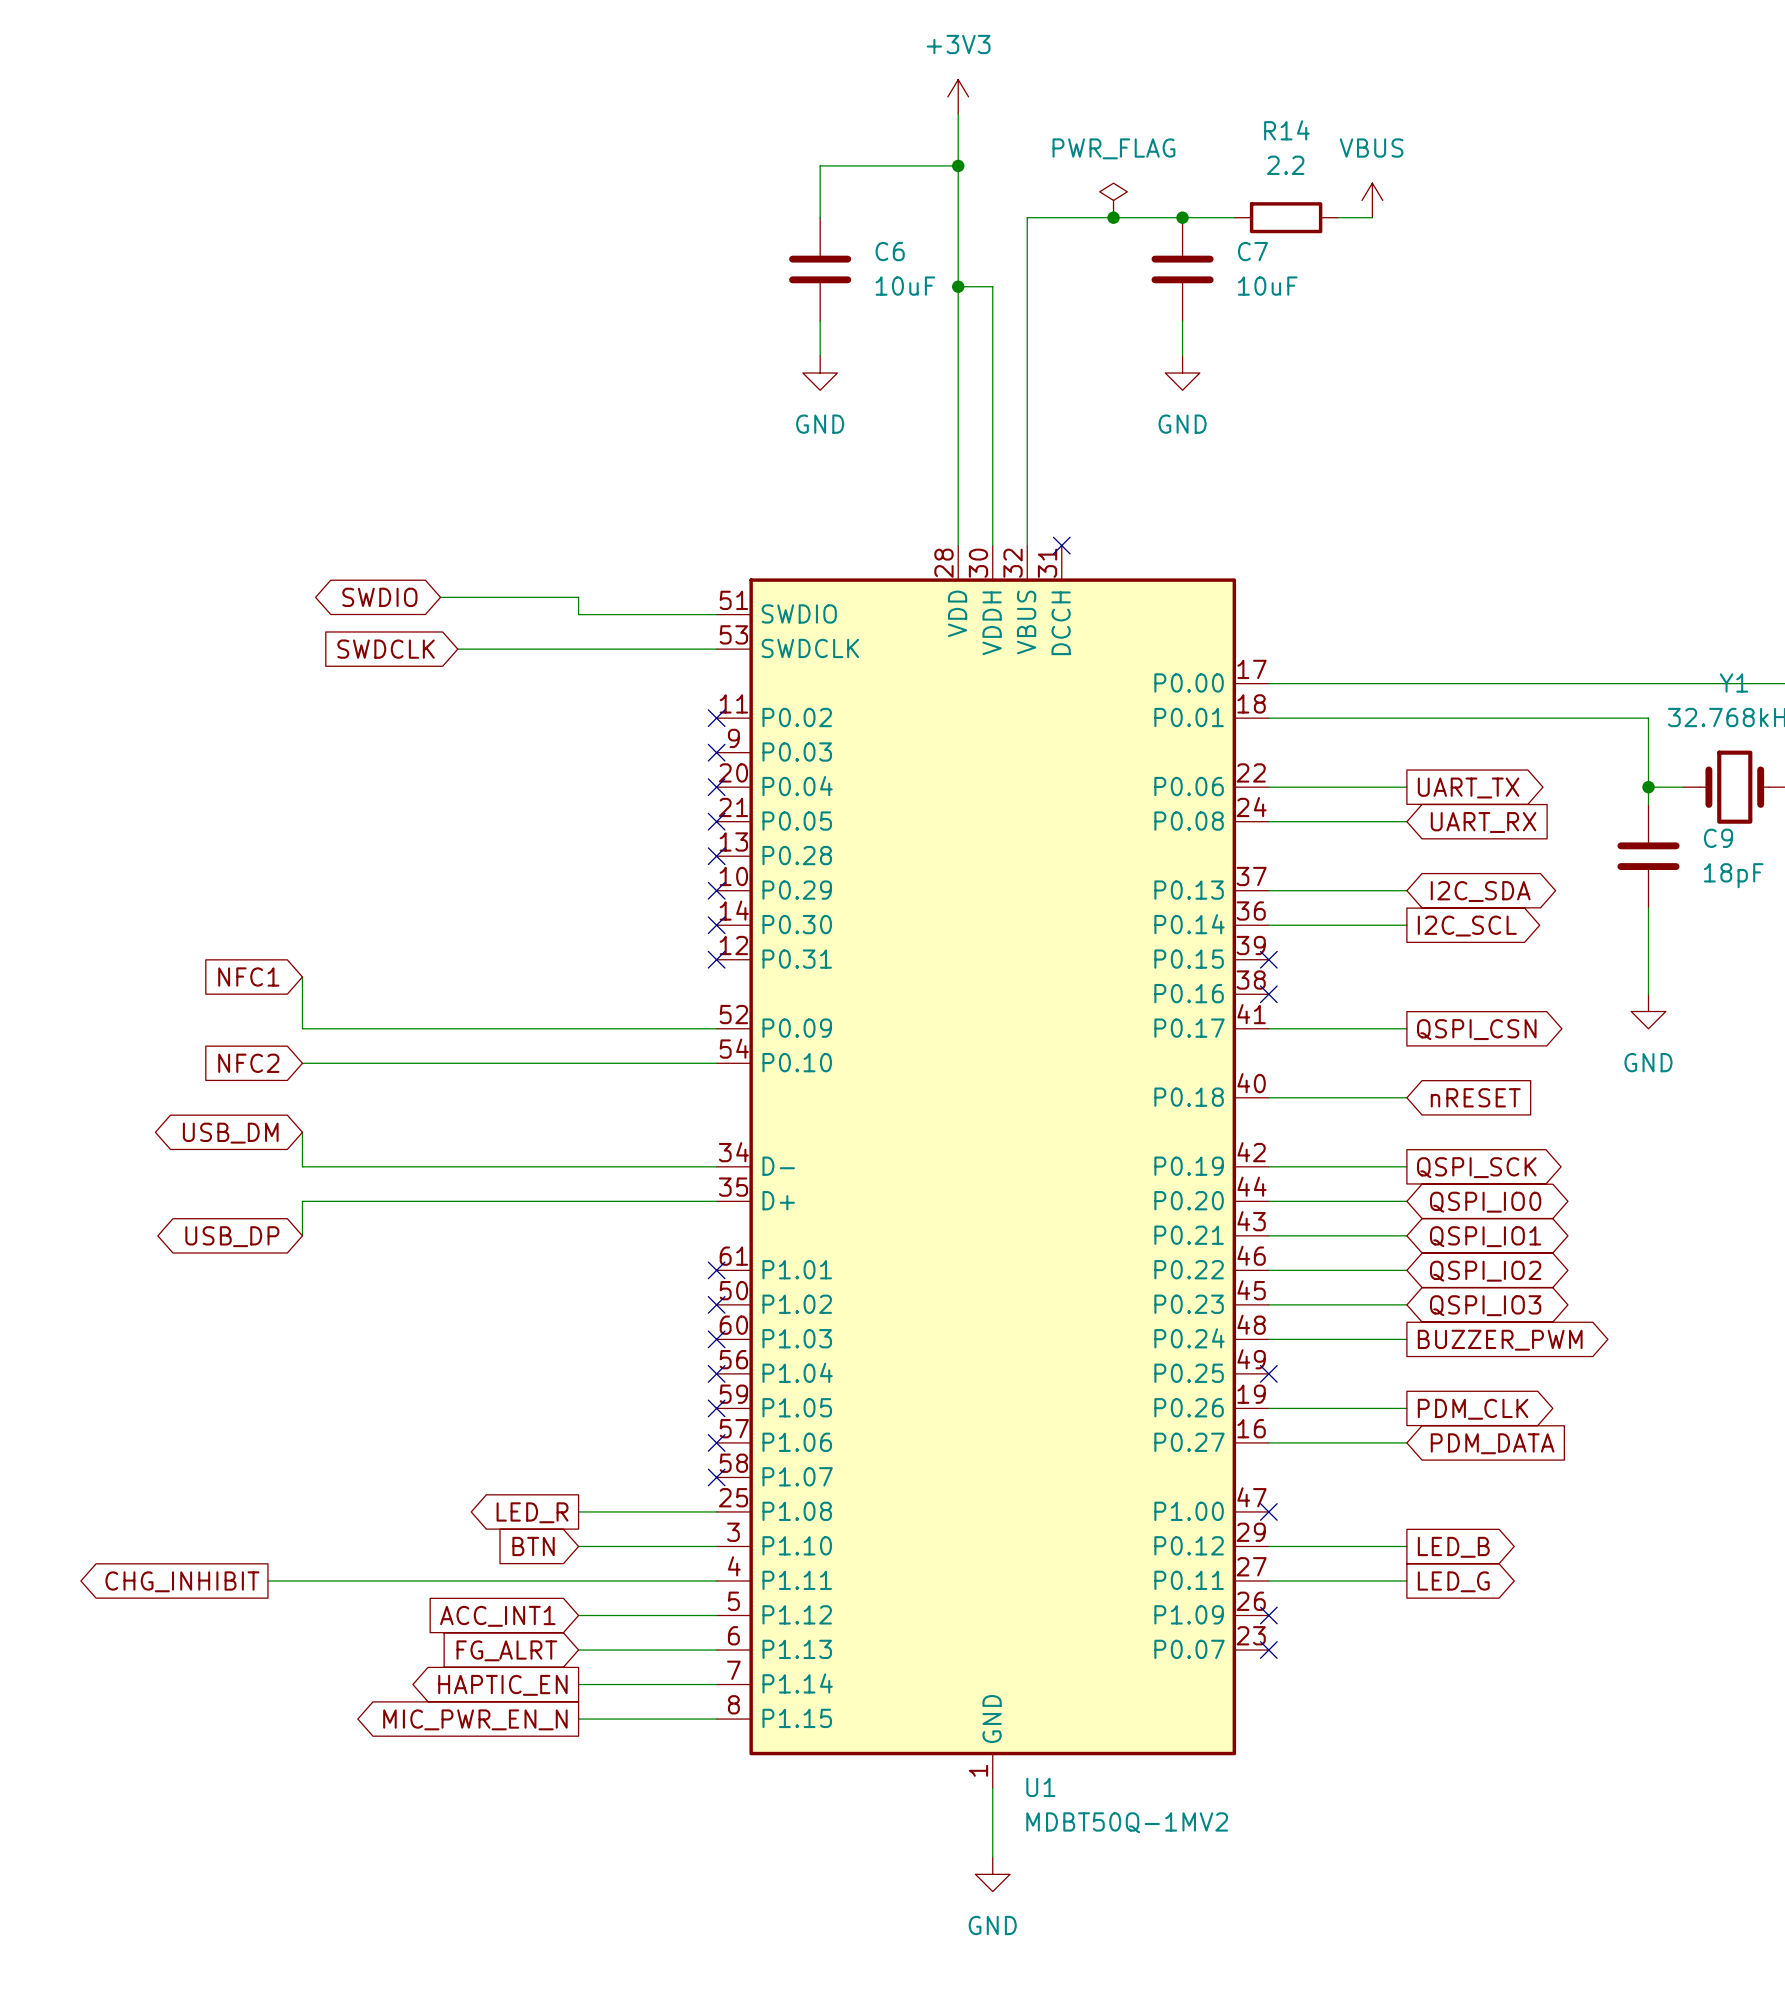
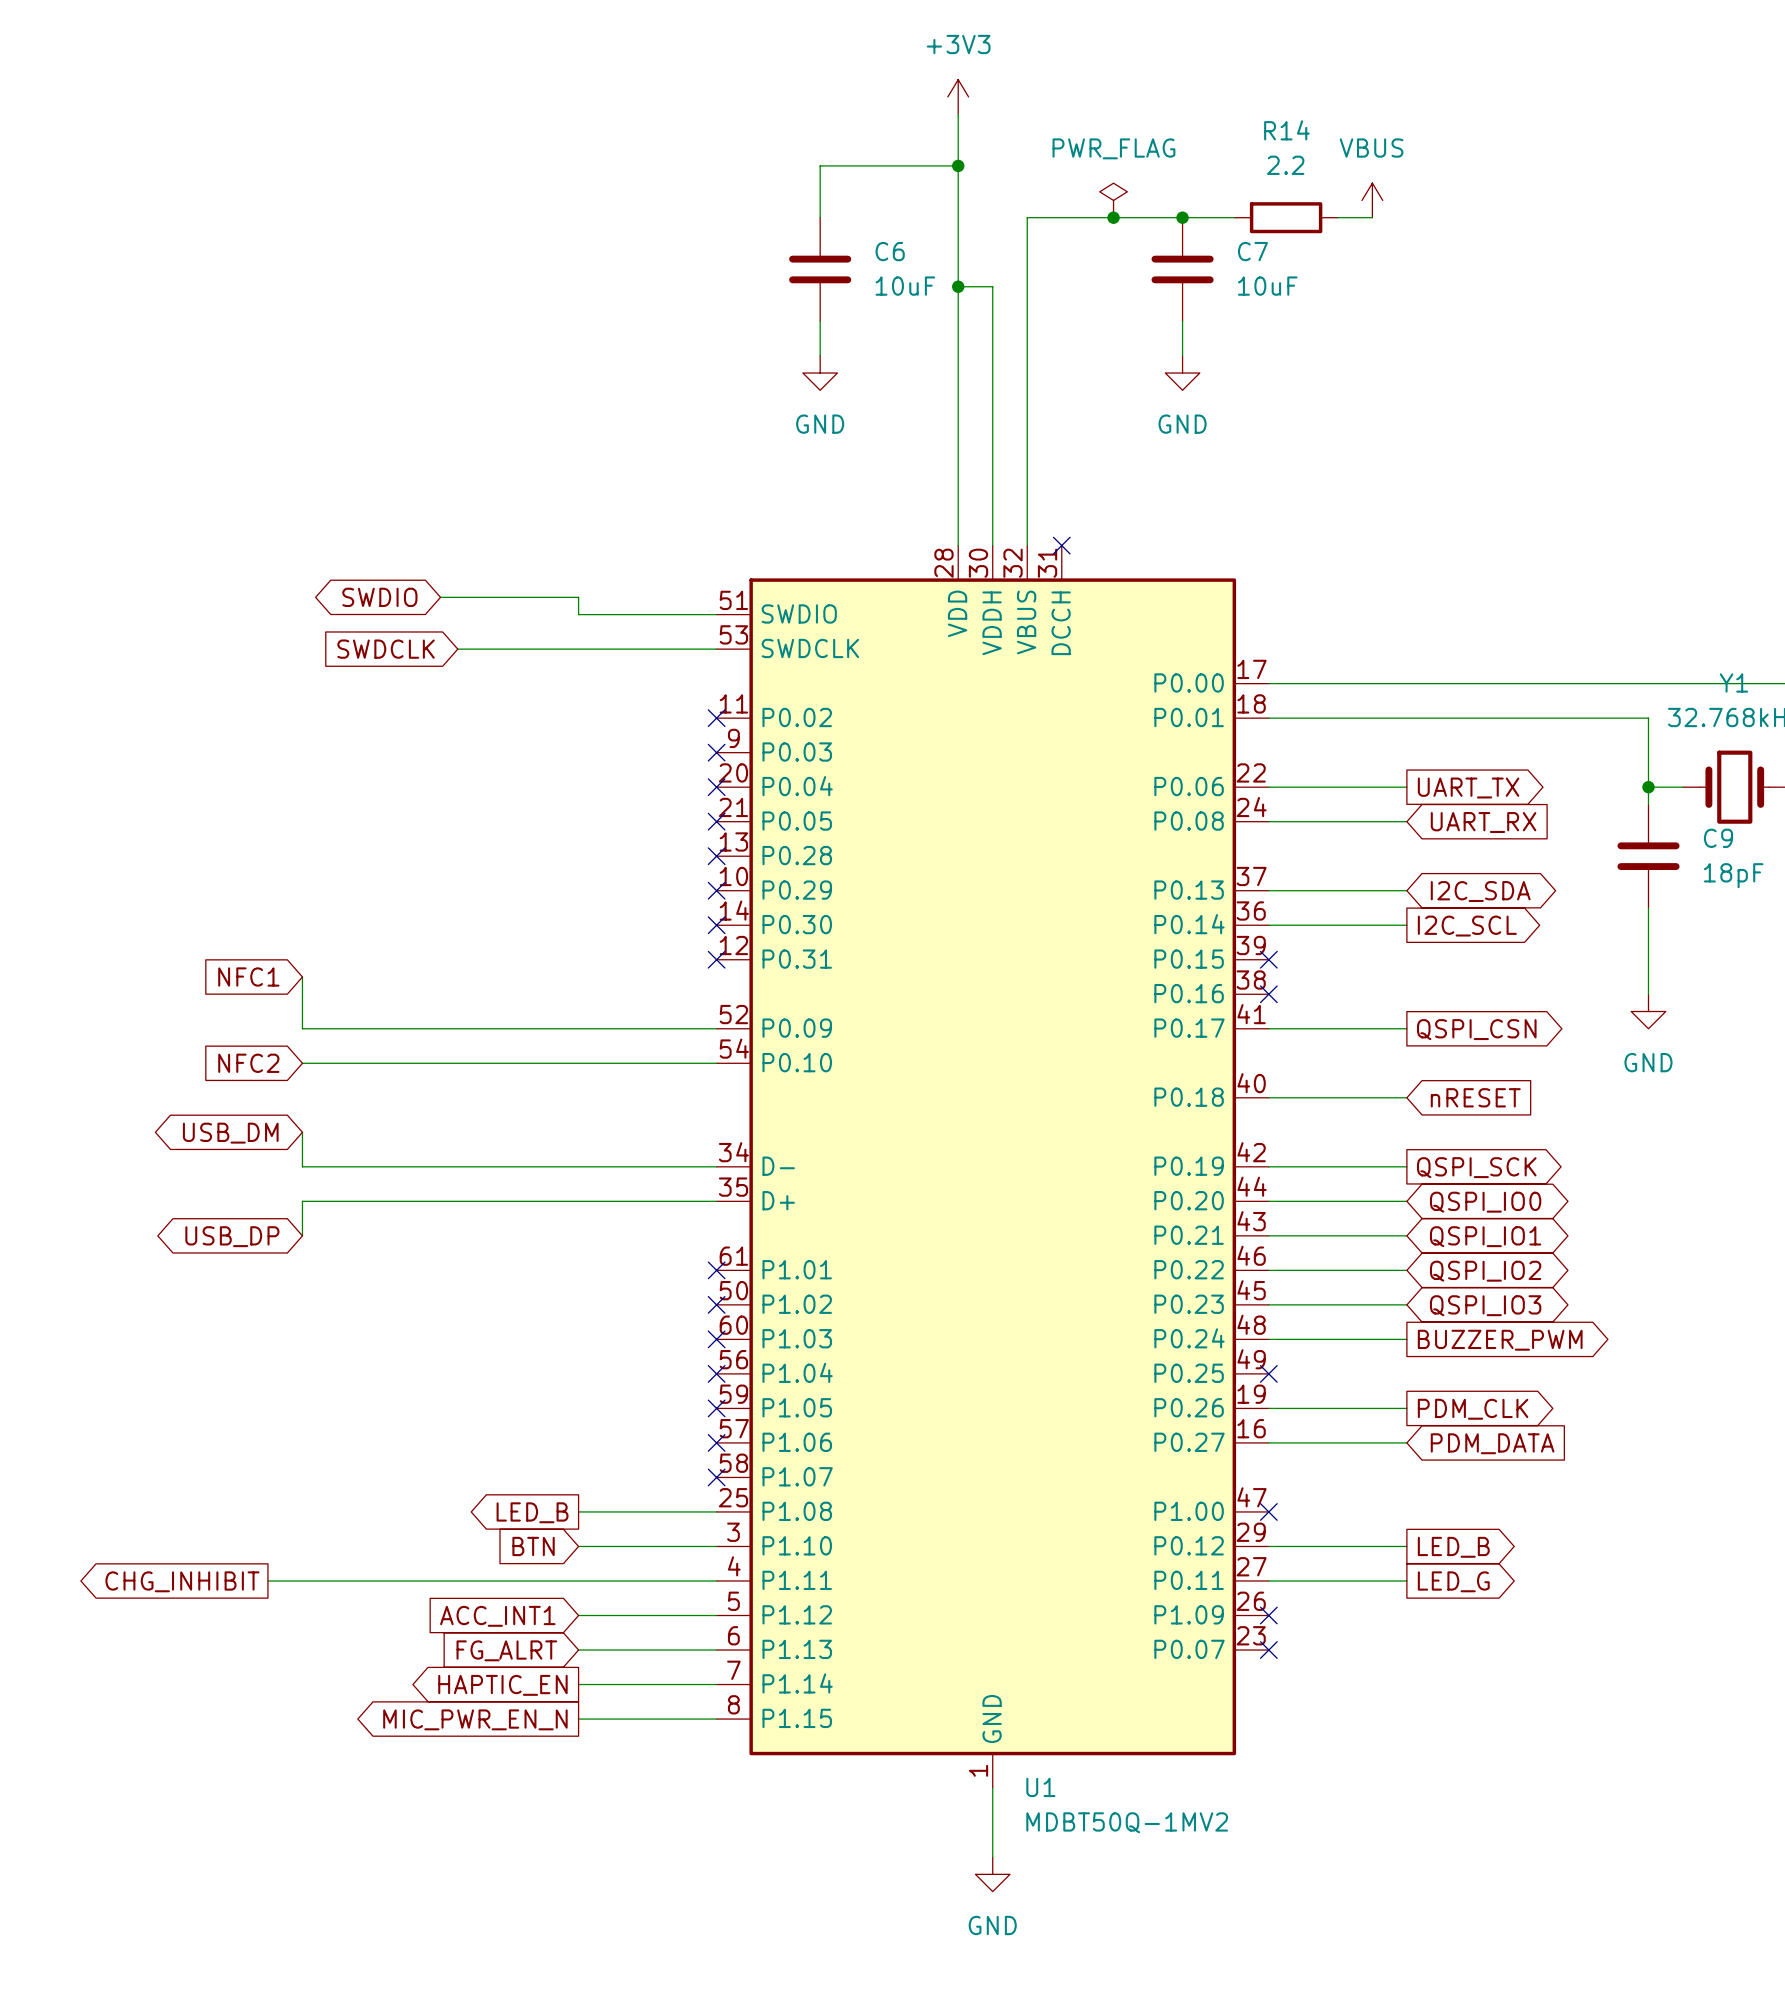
global label: LED_R (532, 1512) -> LED_B (532, 1512)

